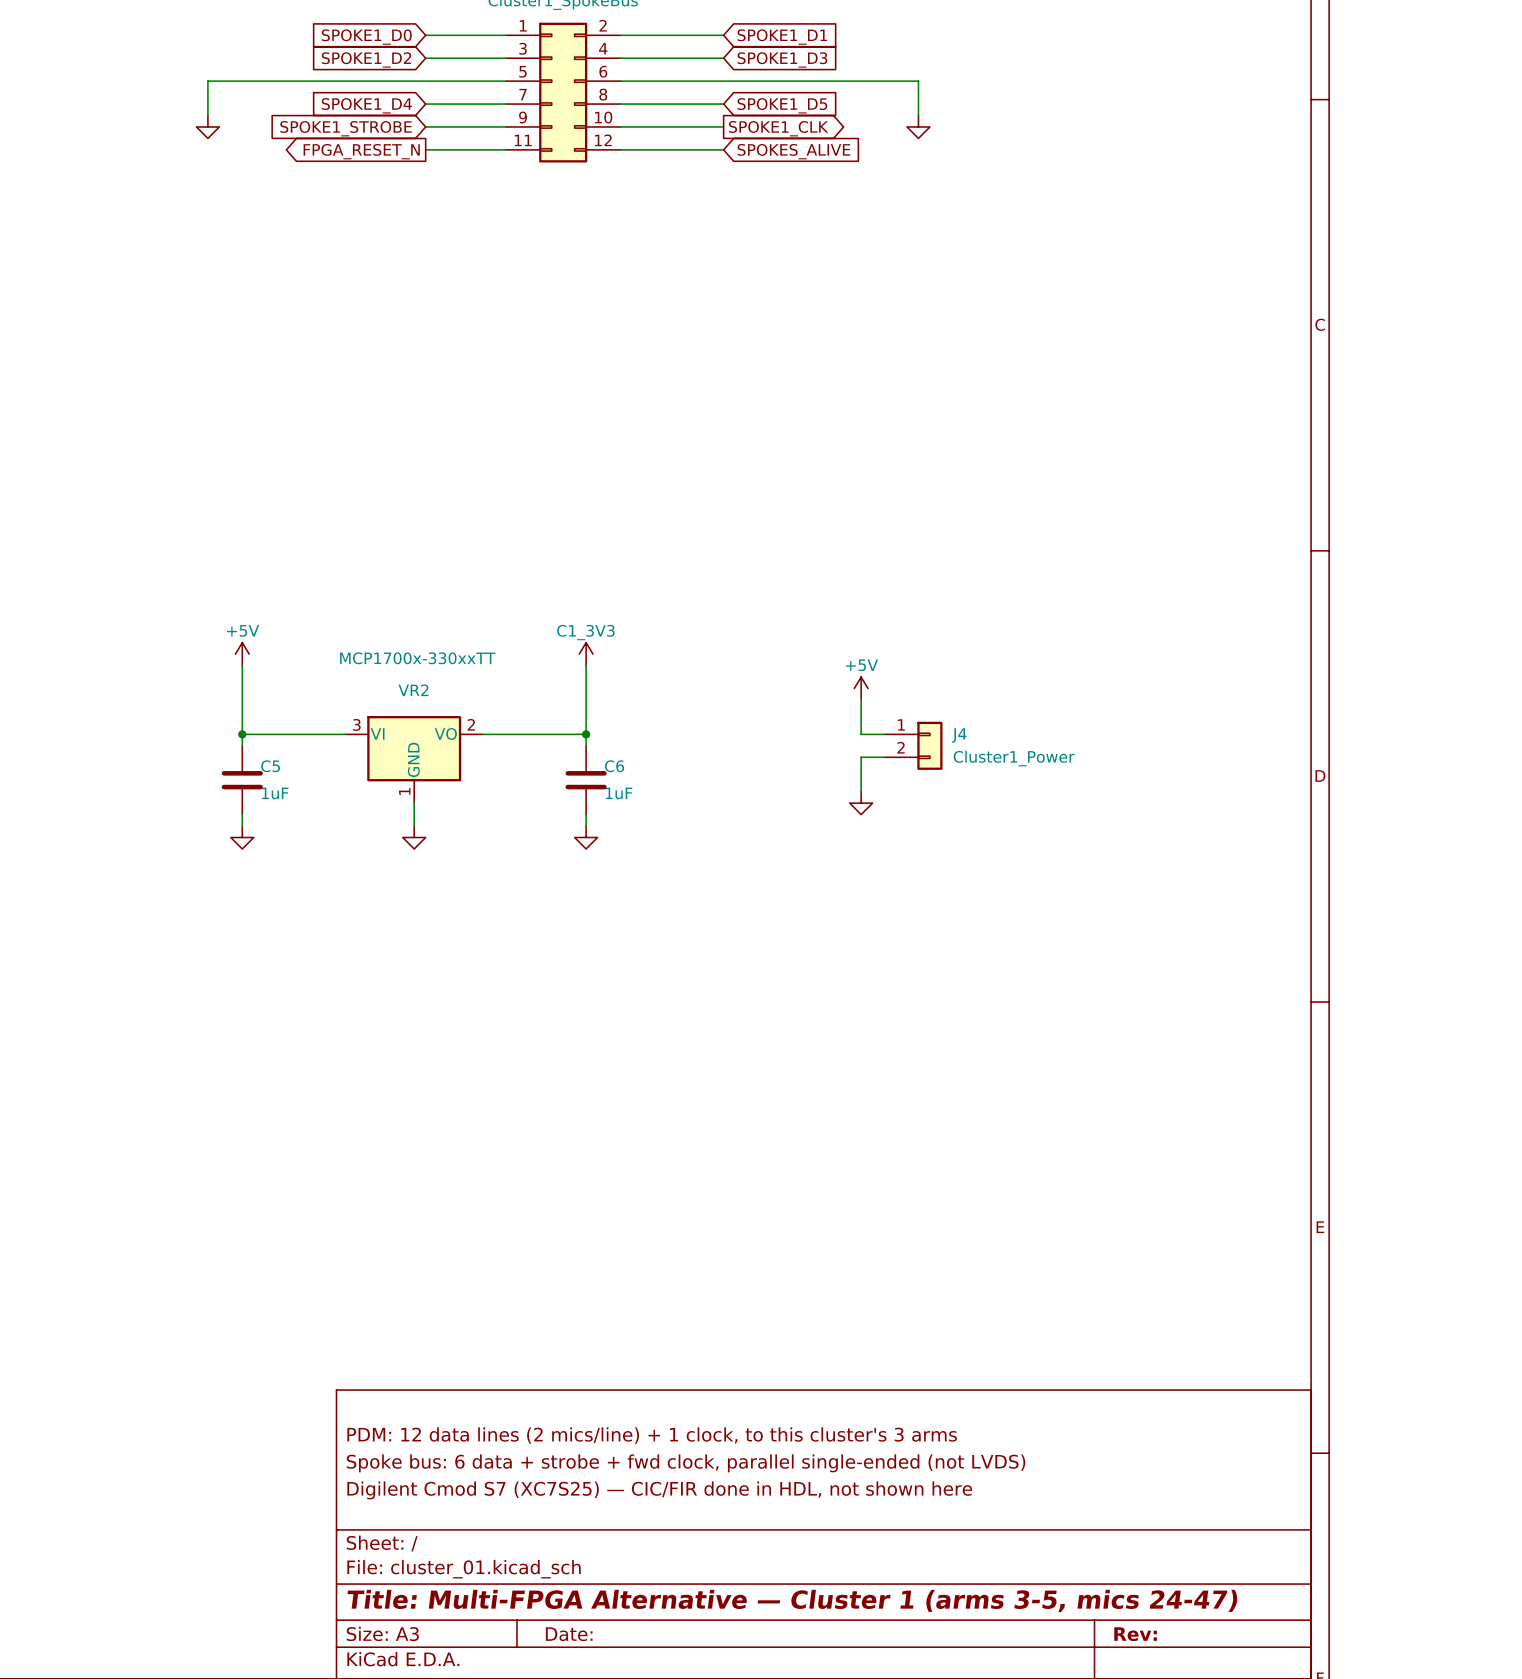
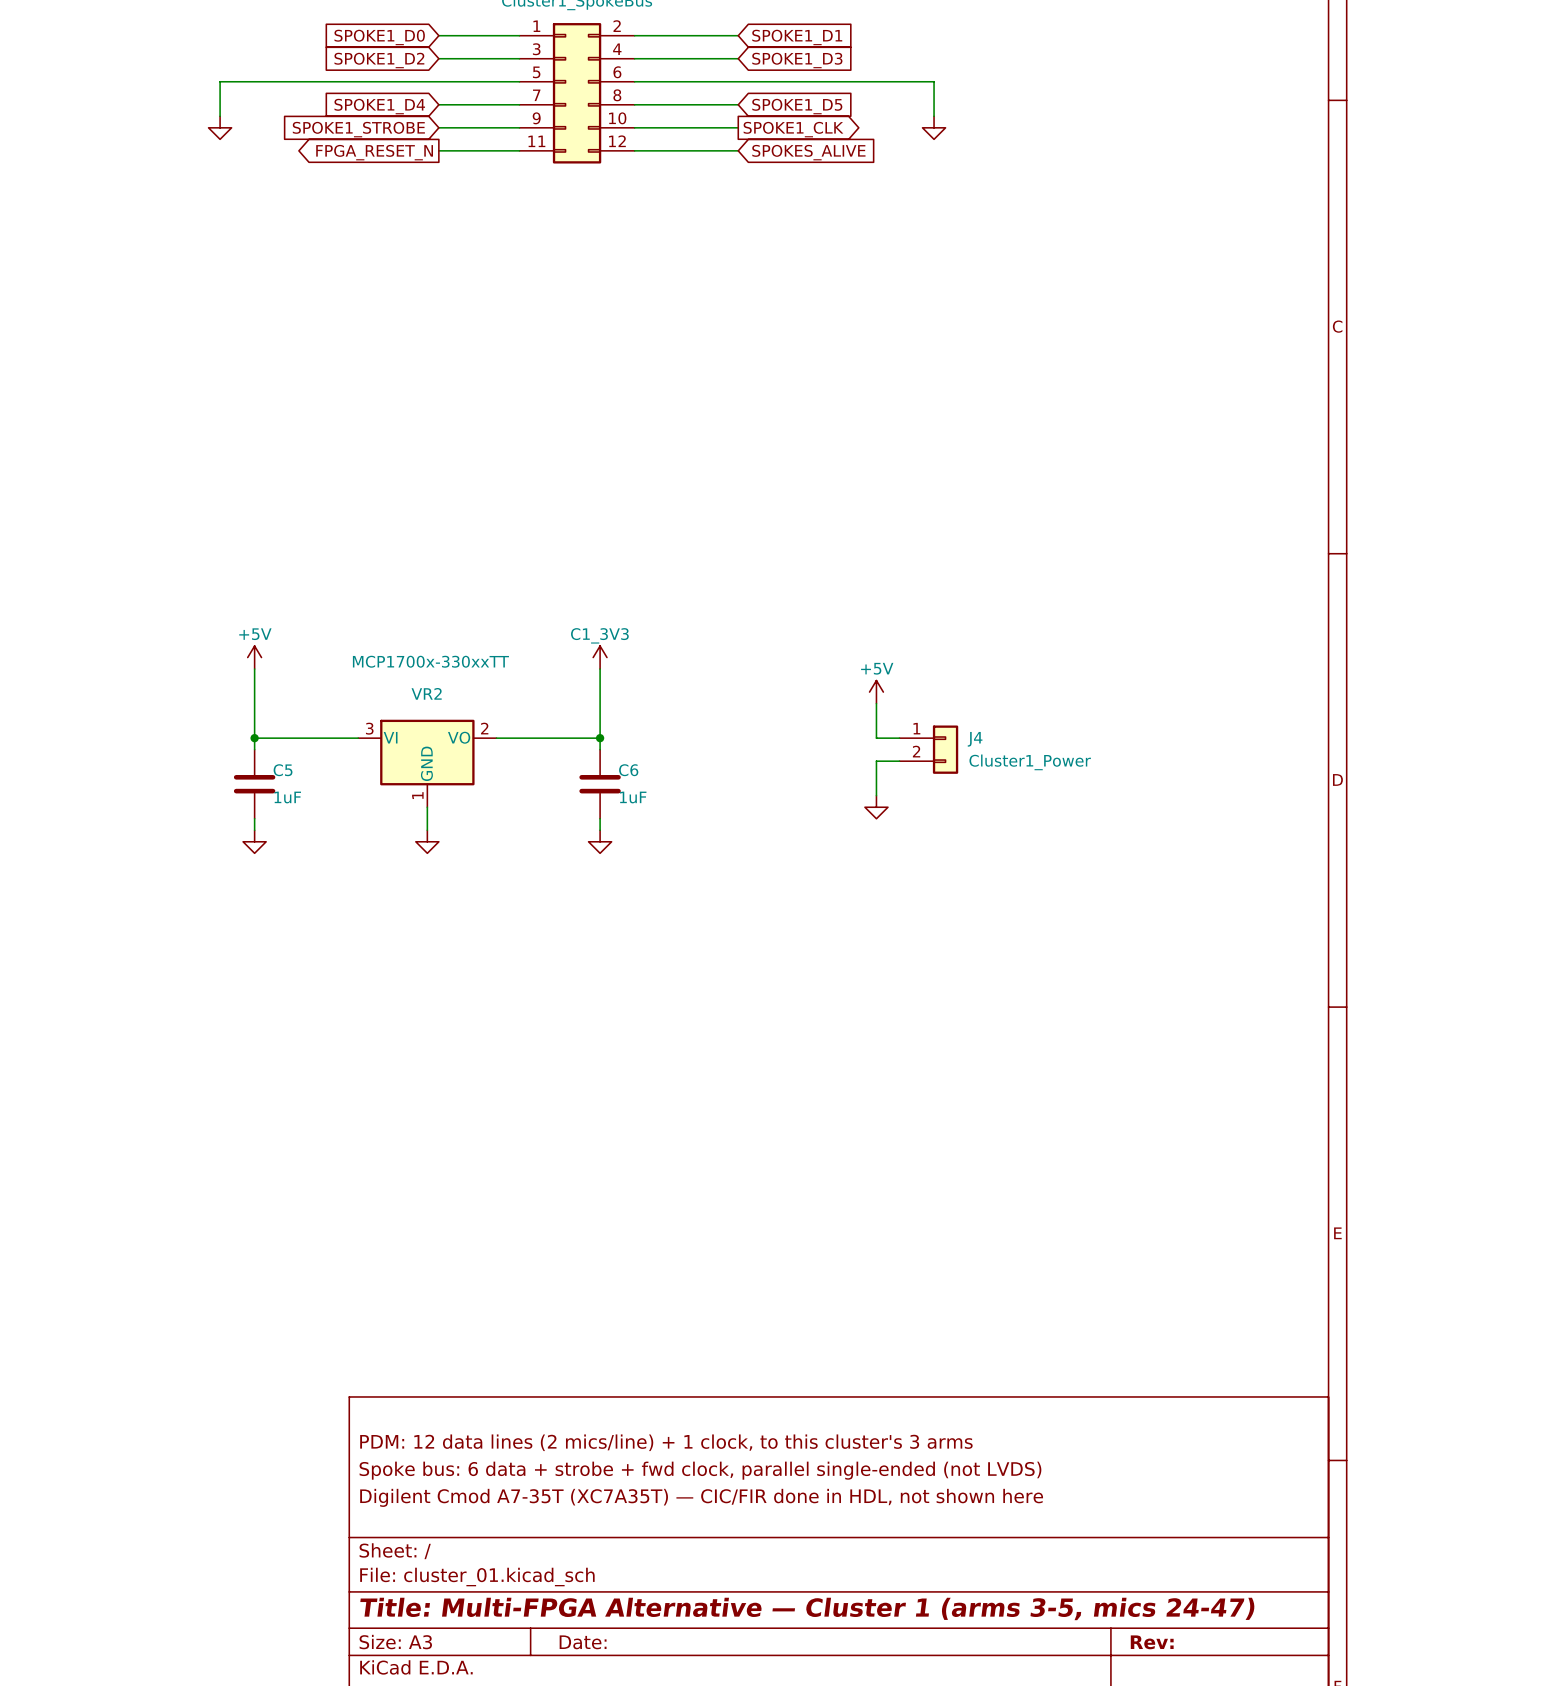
title block: Digilent Cmod S7 (XC7S25) — CIC/FIR done in HDL, not shown here (659, 1490) -> Digilent Cmod A7-35T (XC7A35T) — CIC/FIR done in HDL, not shown here (701, 1497)

